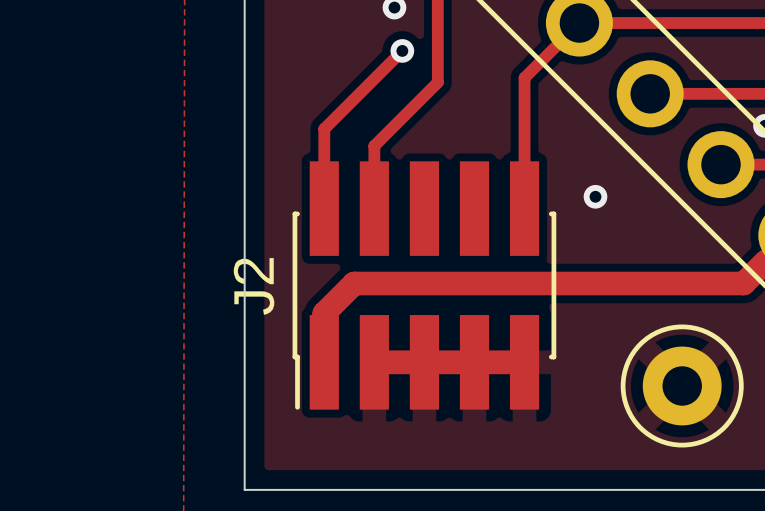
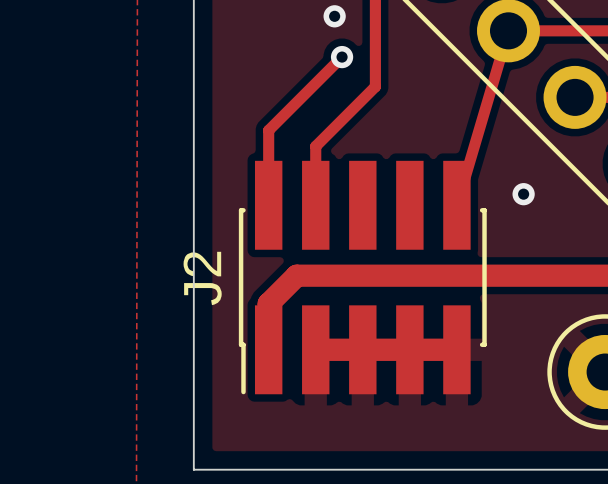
track: (579, 23) (524, 77) (524, 208) -> (508, 30) (456, 205)

